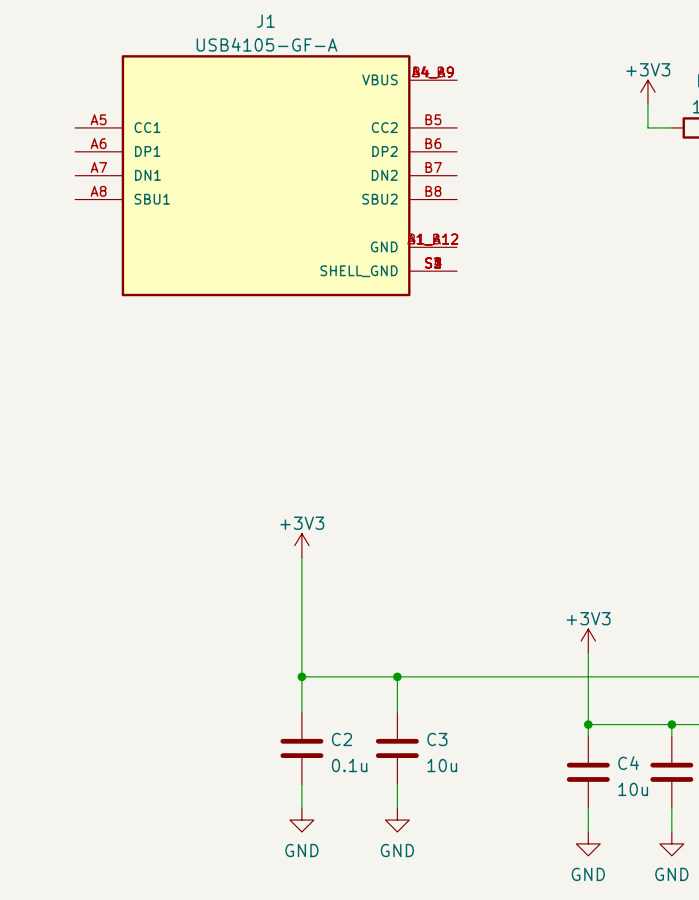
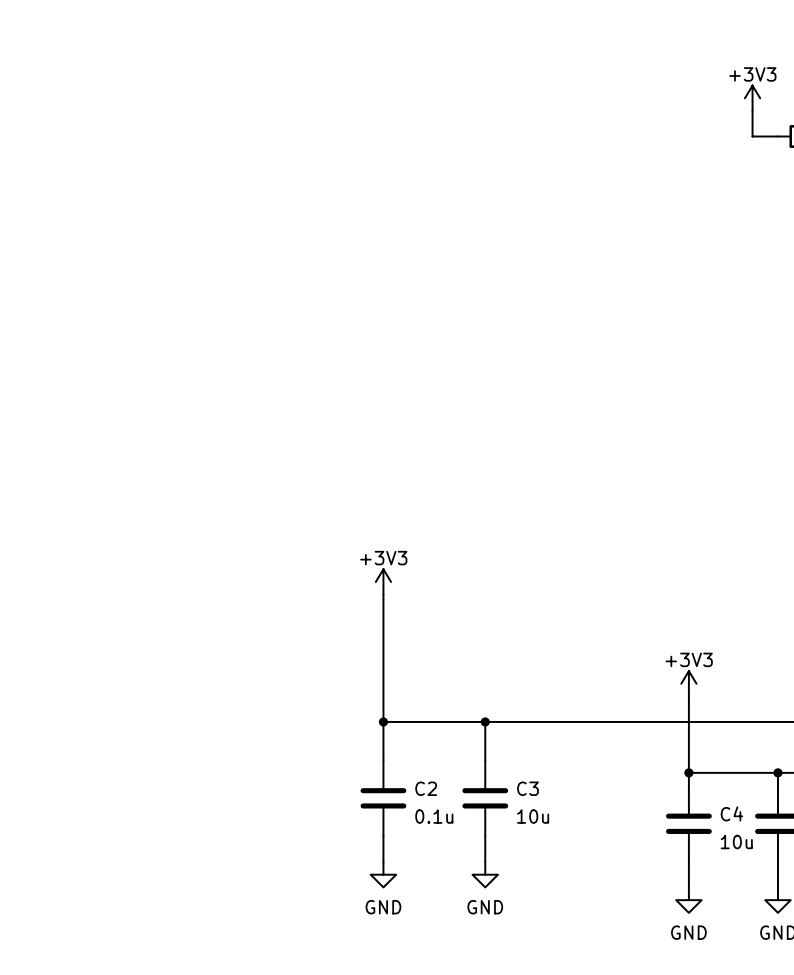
J1: USB4105-GF-A (266, 175) -> none

